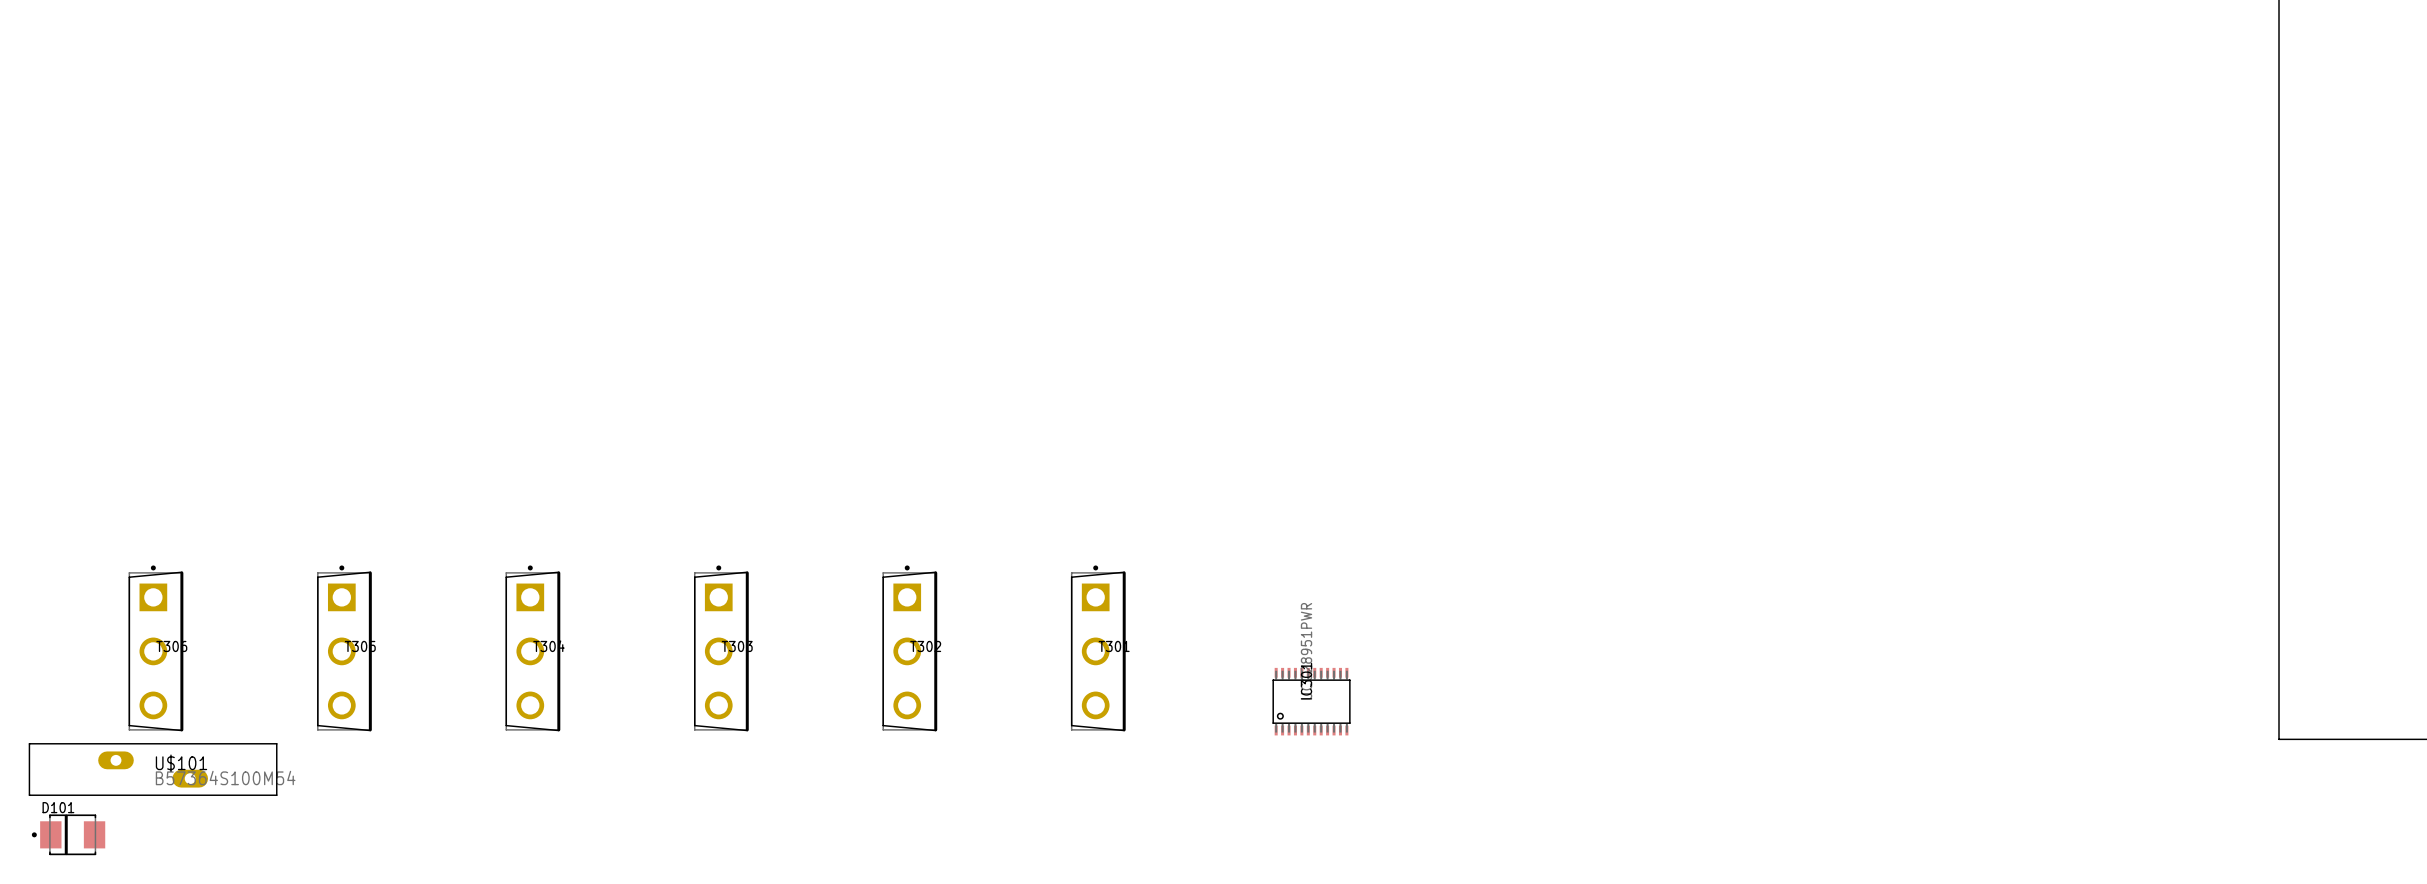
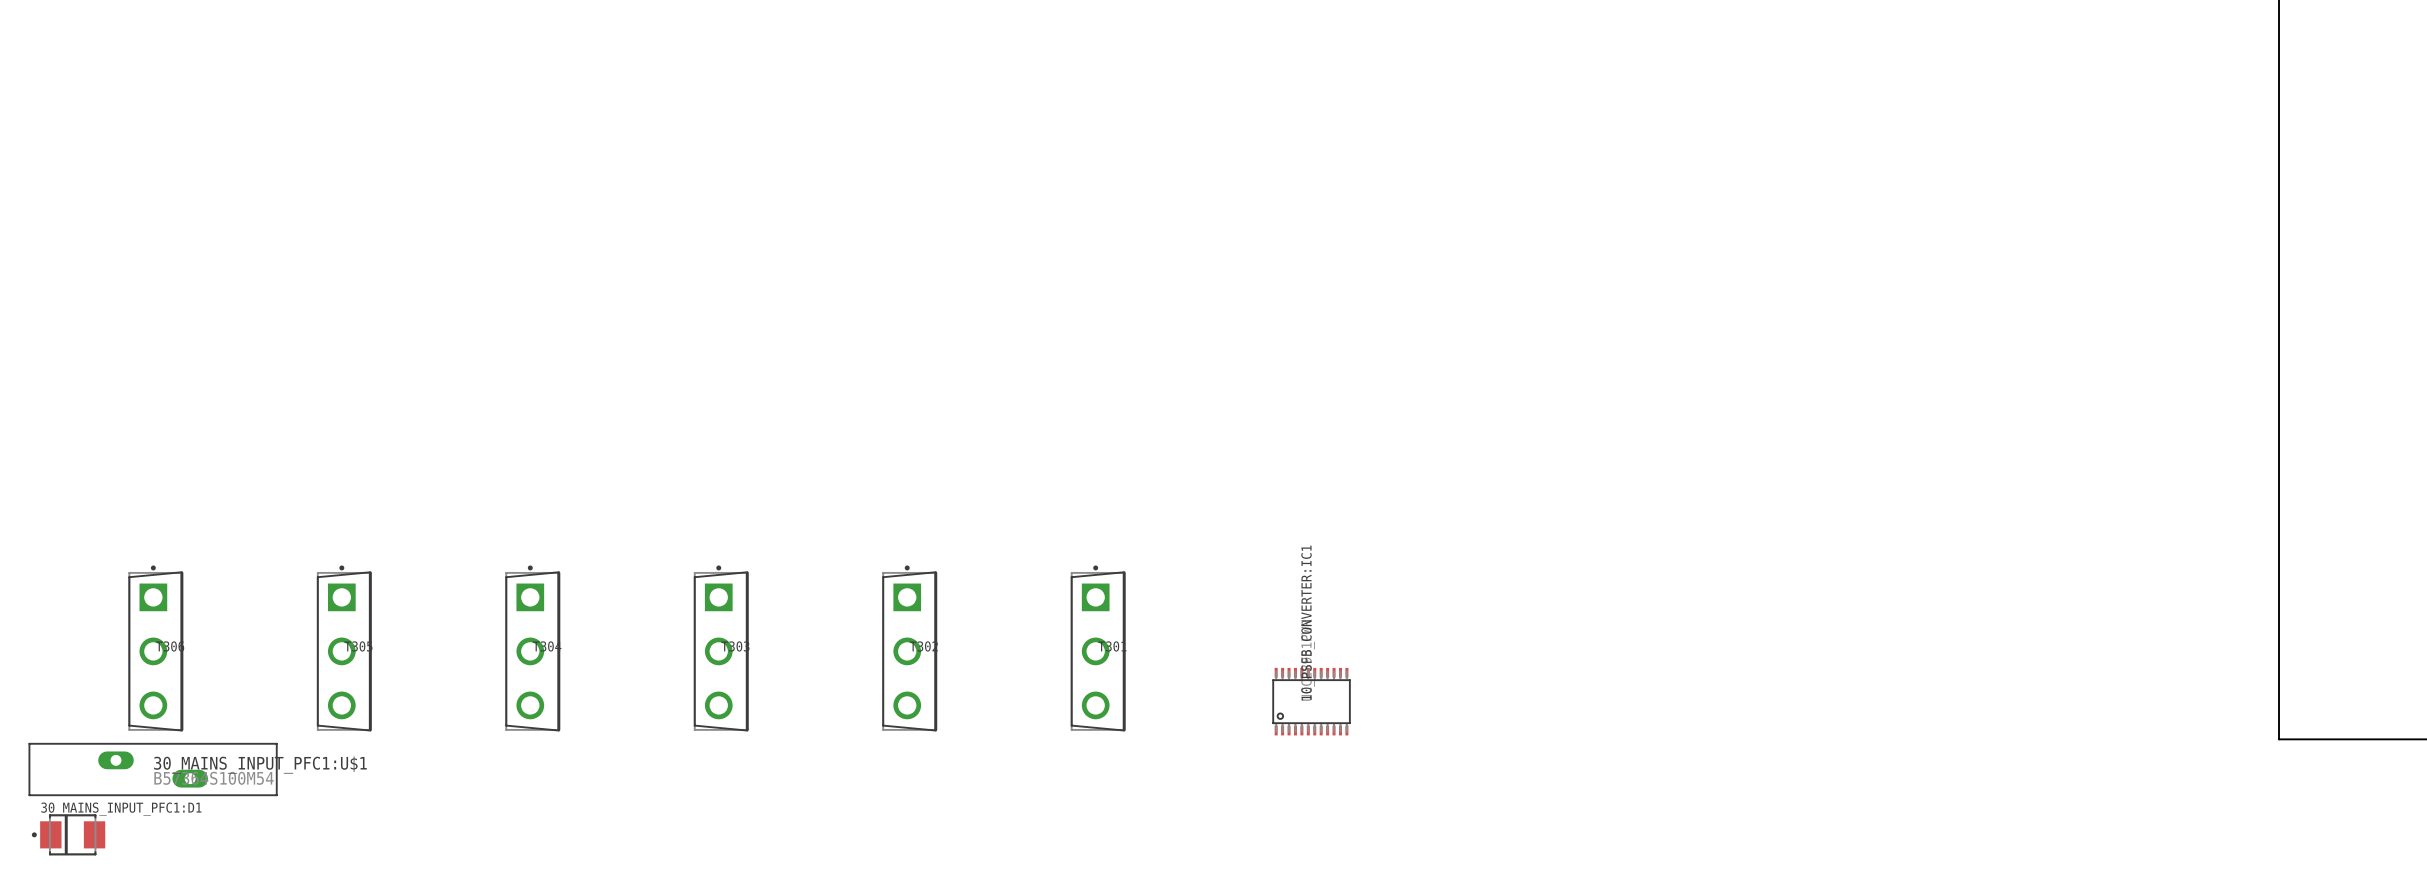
IC301 name: IC301 (1306, 681) -> 10_PSFB_CONVERTER:IC1 (1308, 622)
U$101 name: U$101 (181, 763) -> 30_MAINS_INPUT_PFC1:U$1 (260, 764)
D101 name: D101 (58, 807) -> 30_MAINS_INPUT_PFC1:D1 (121, 809)

